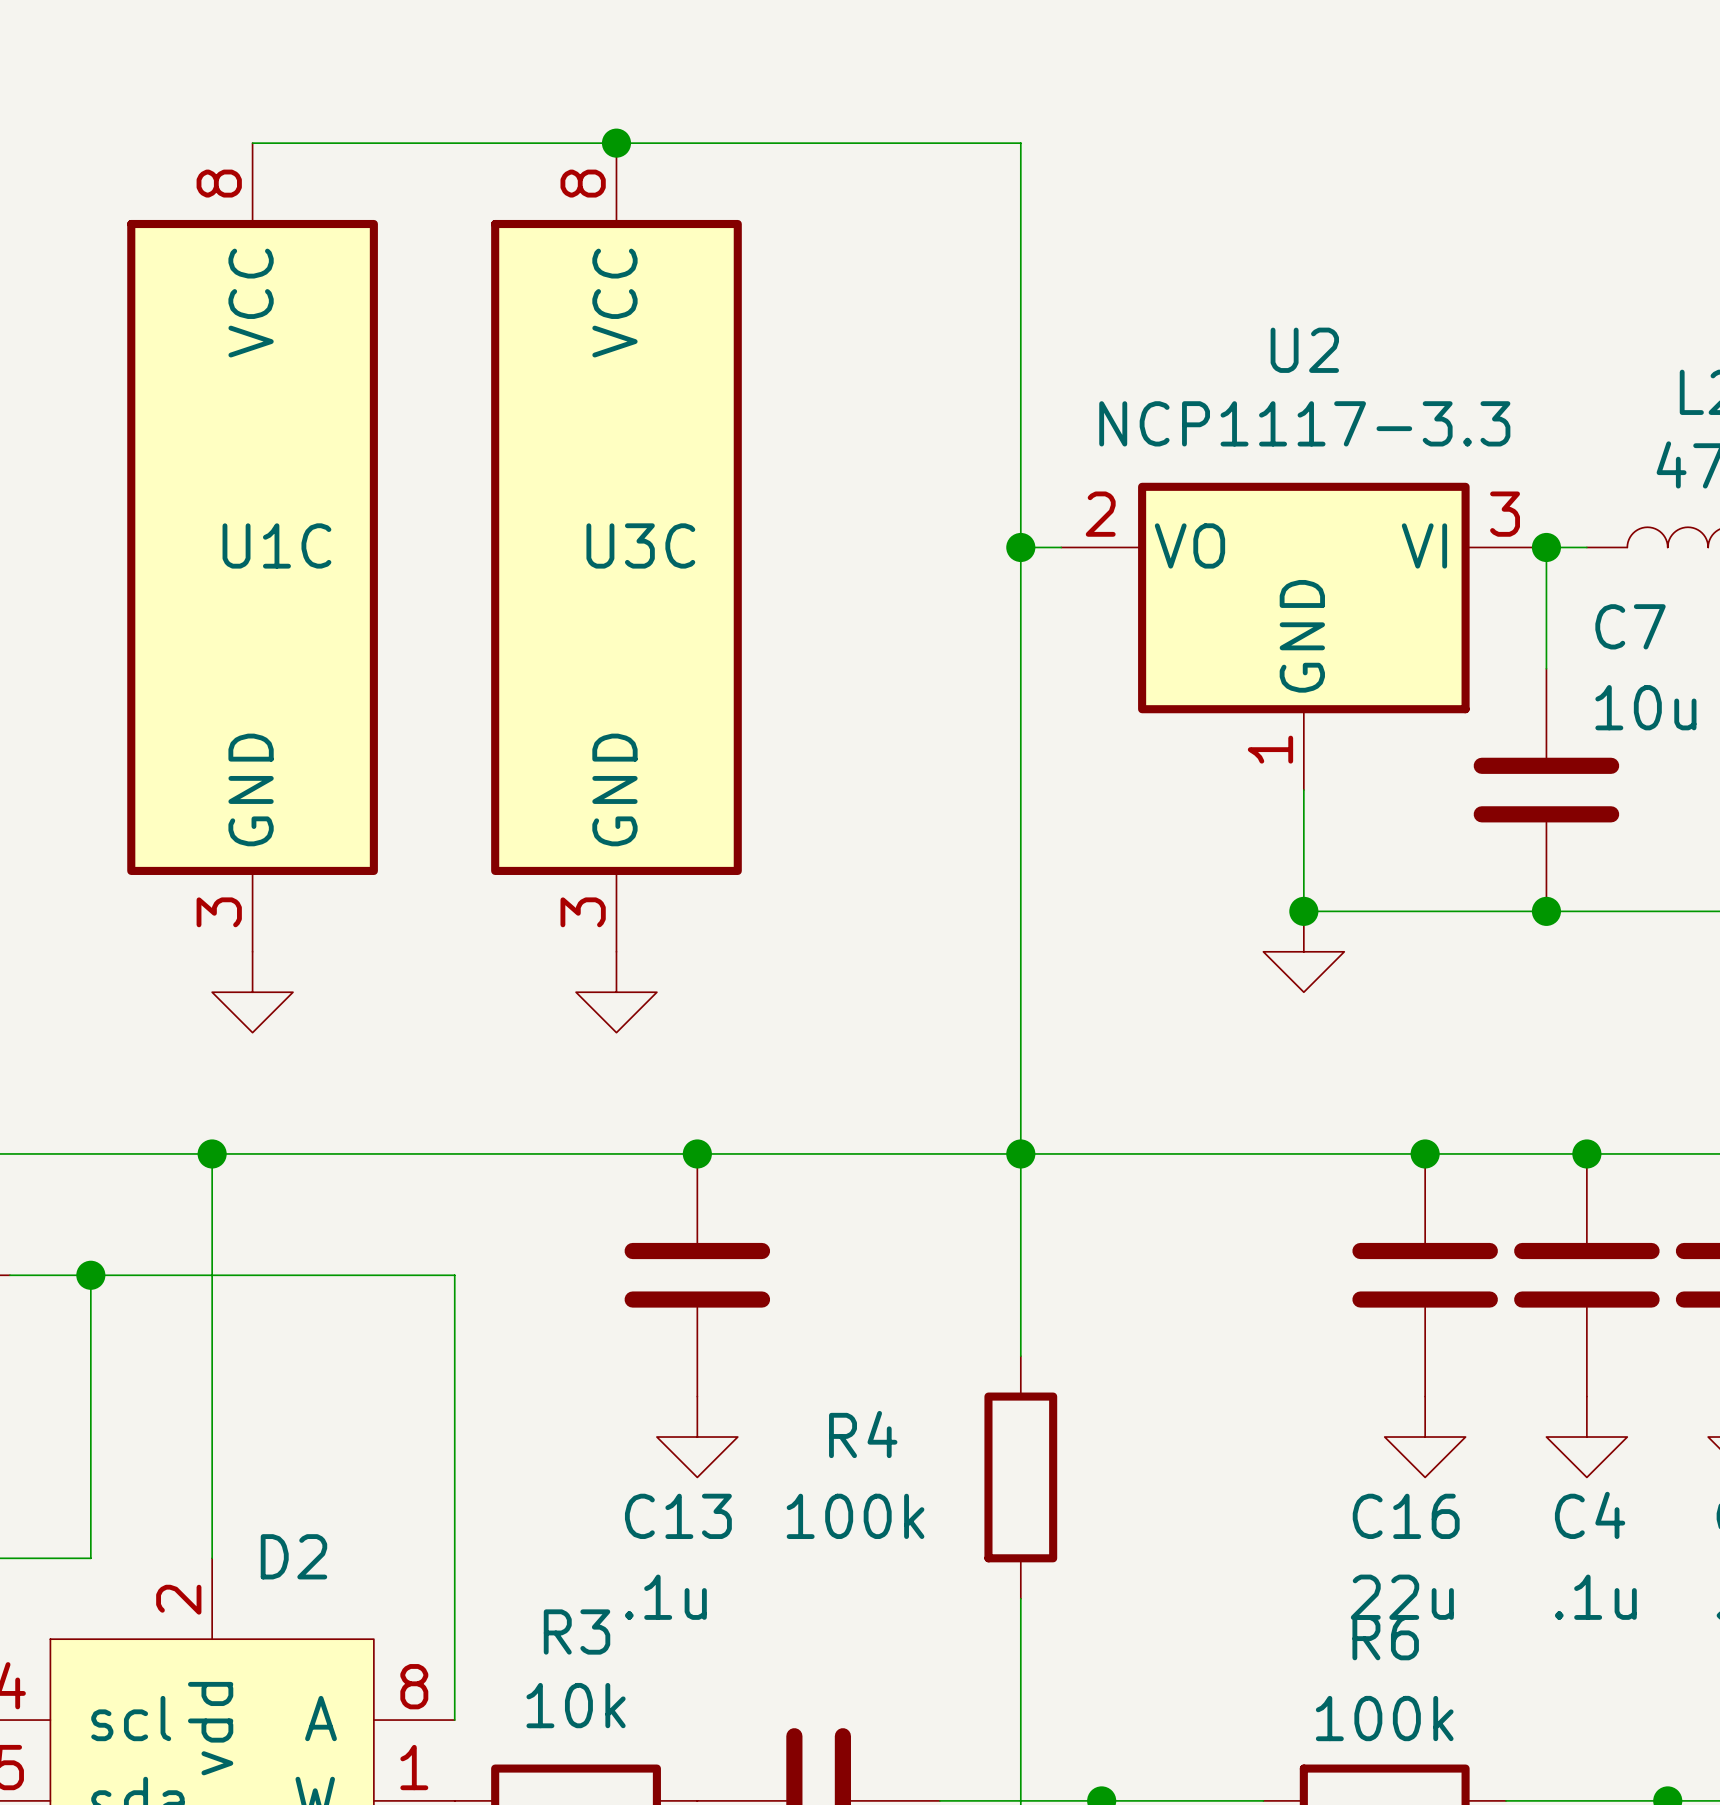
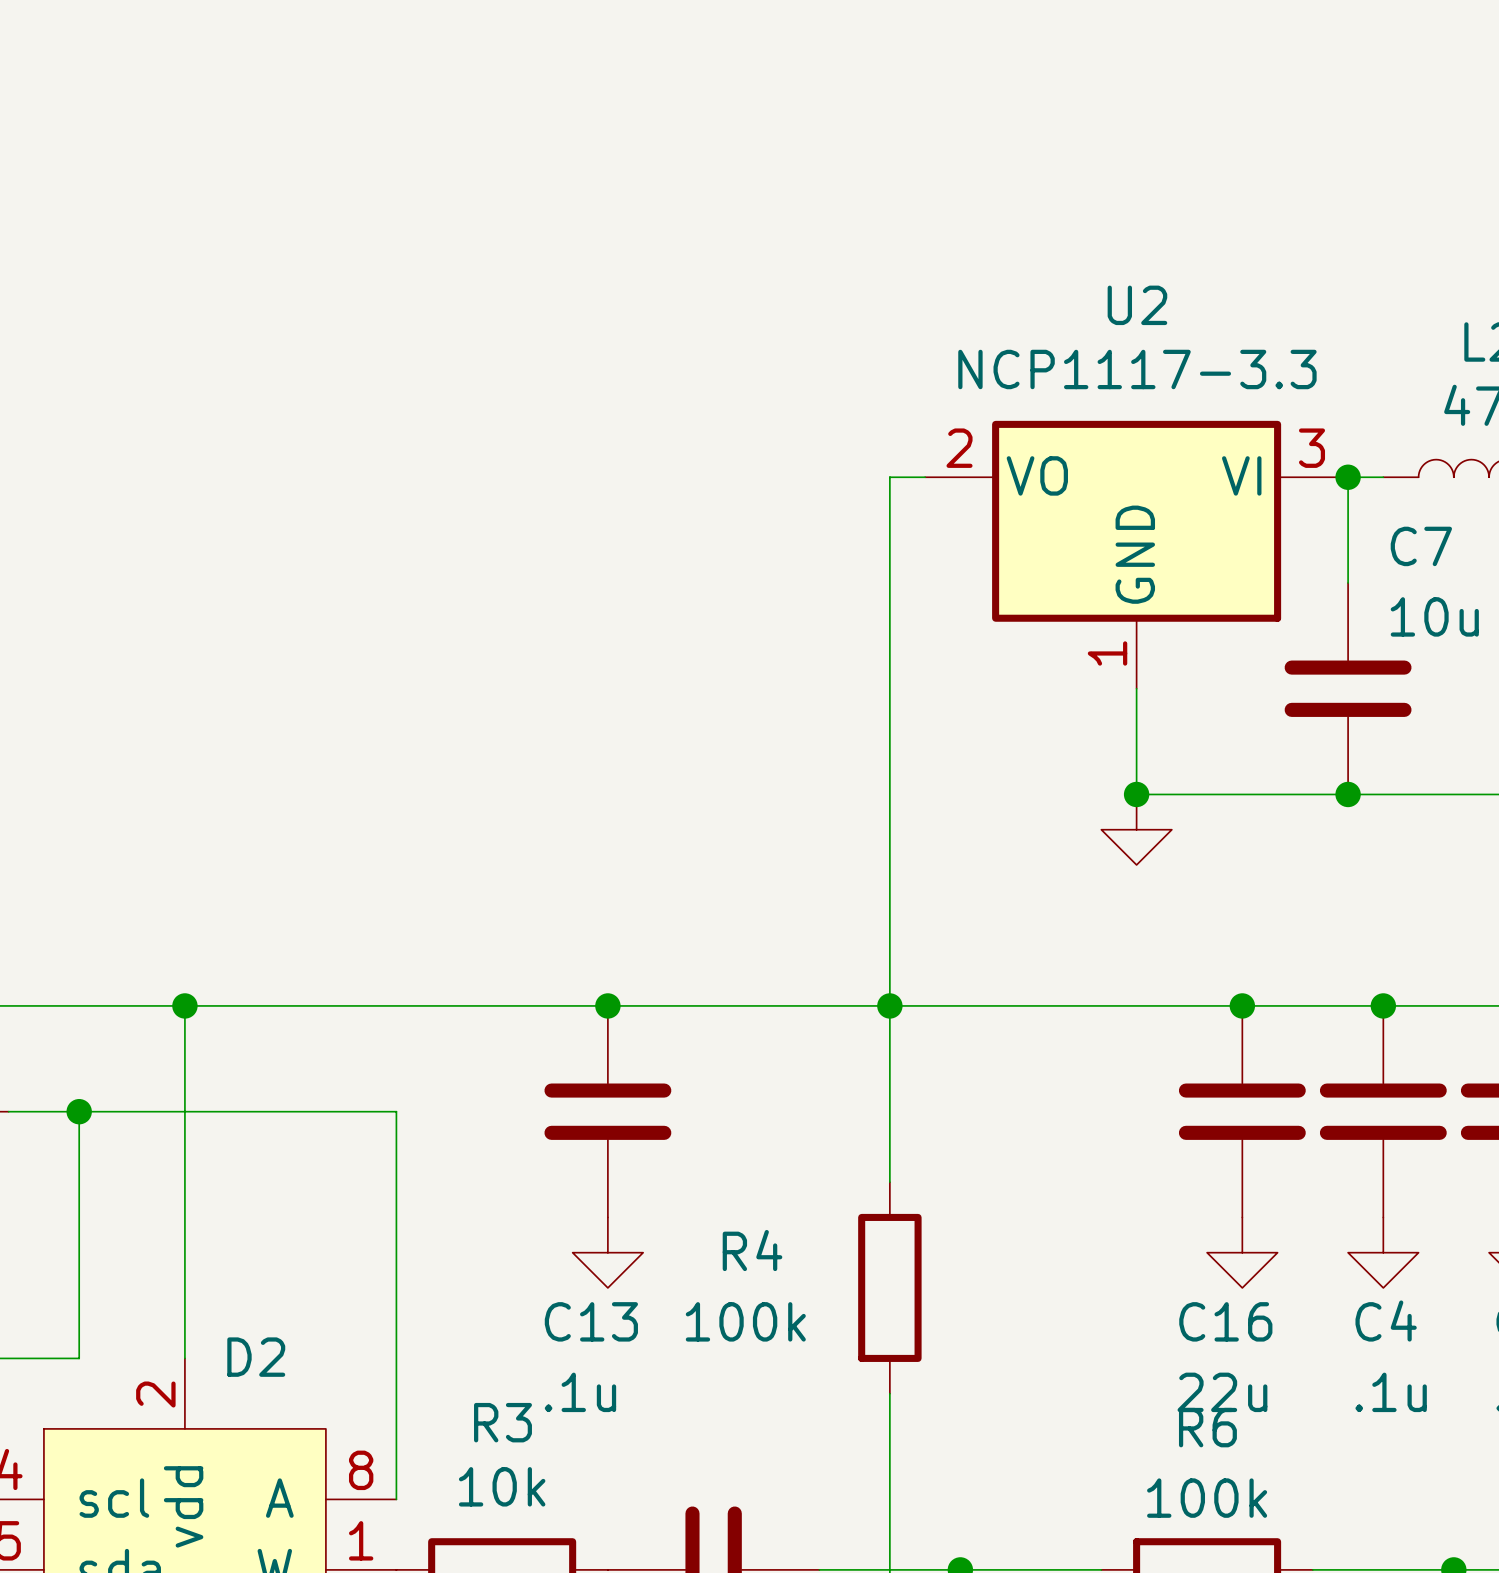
wire: (252, 143) (1020, 143) (1020, 547) -> none
junction: (616, 143) -> none
U1C: (252, 547) -> none
U3C: (616, 547) -> none
junction: (1020, 547) -> none
power symbol: (252, 992) -> none
power symbol: (616, 992) -> none

